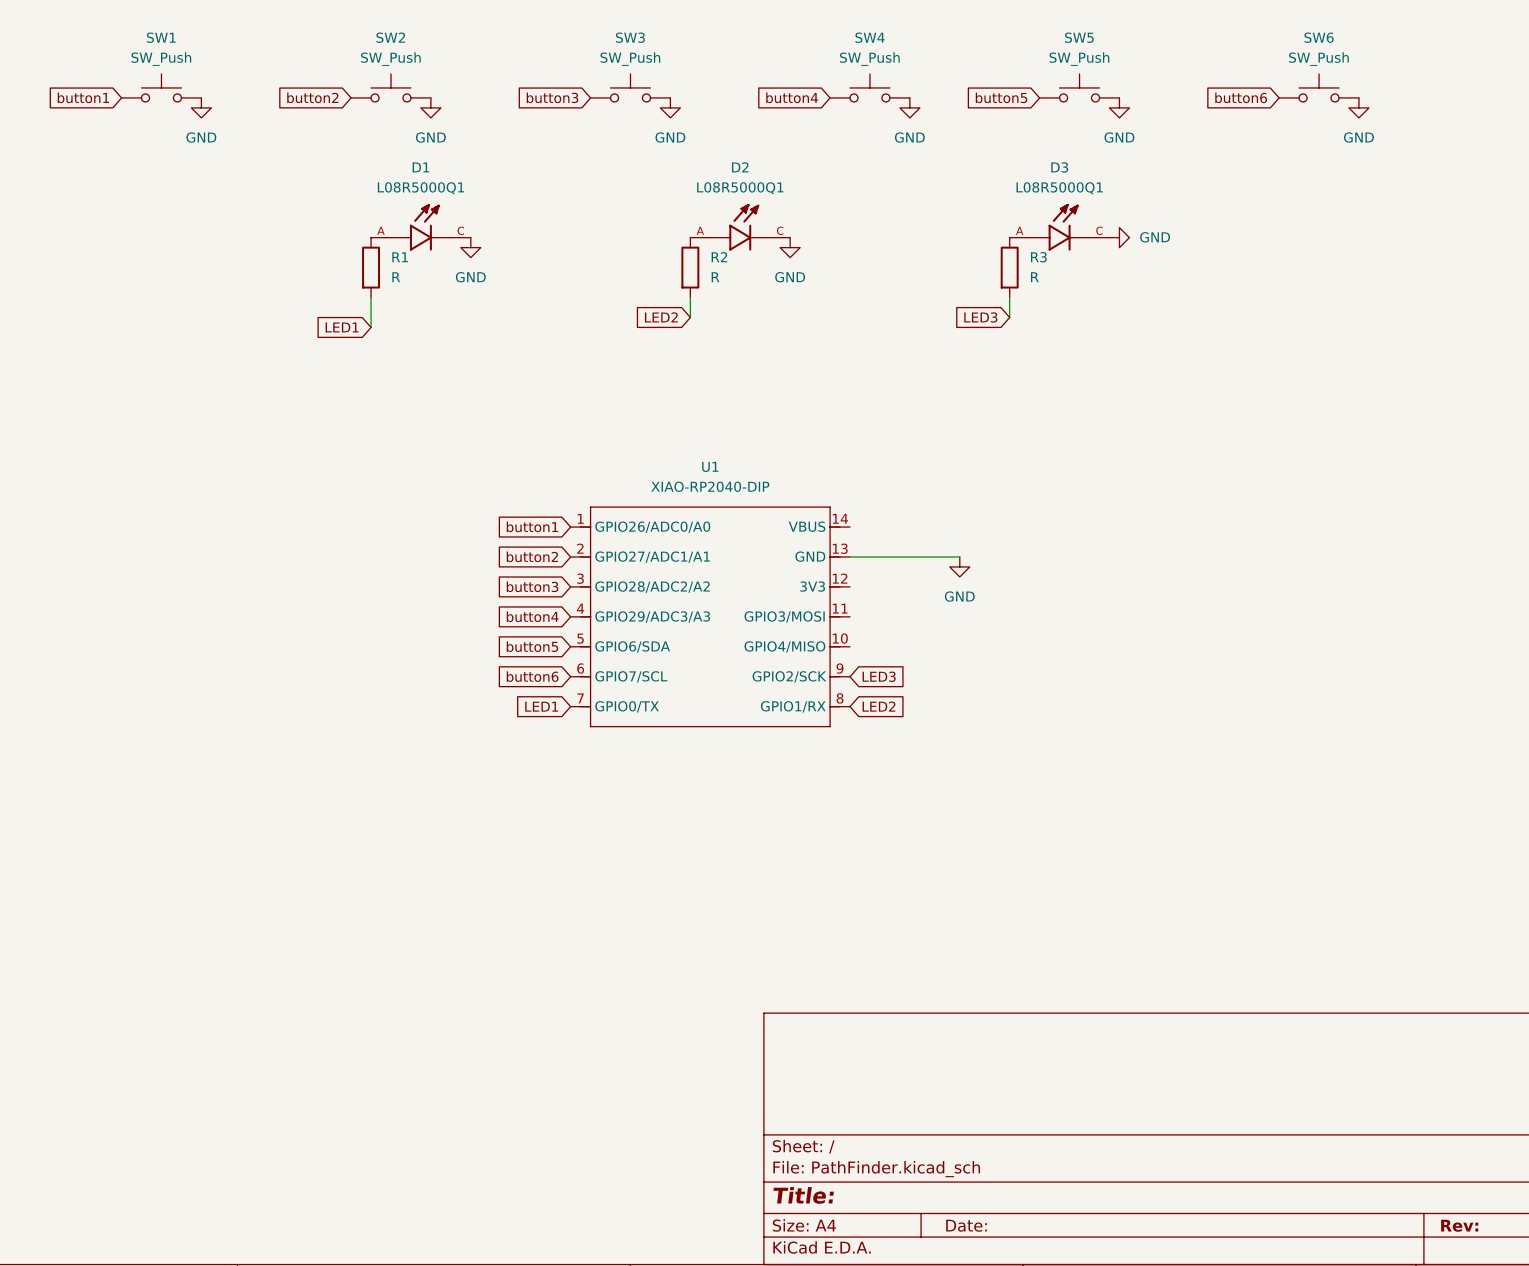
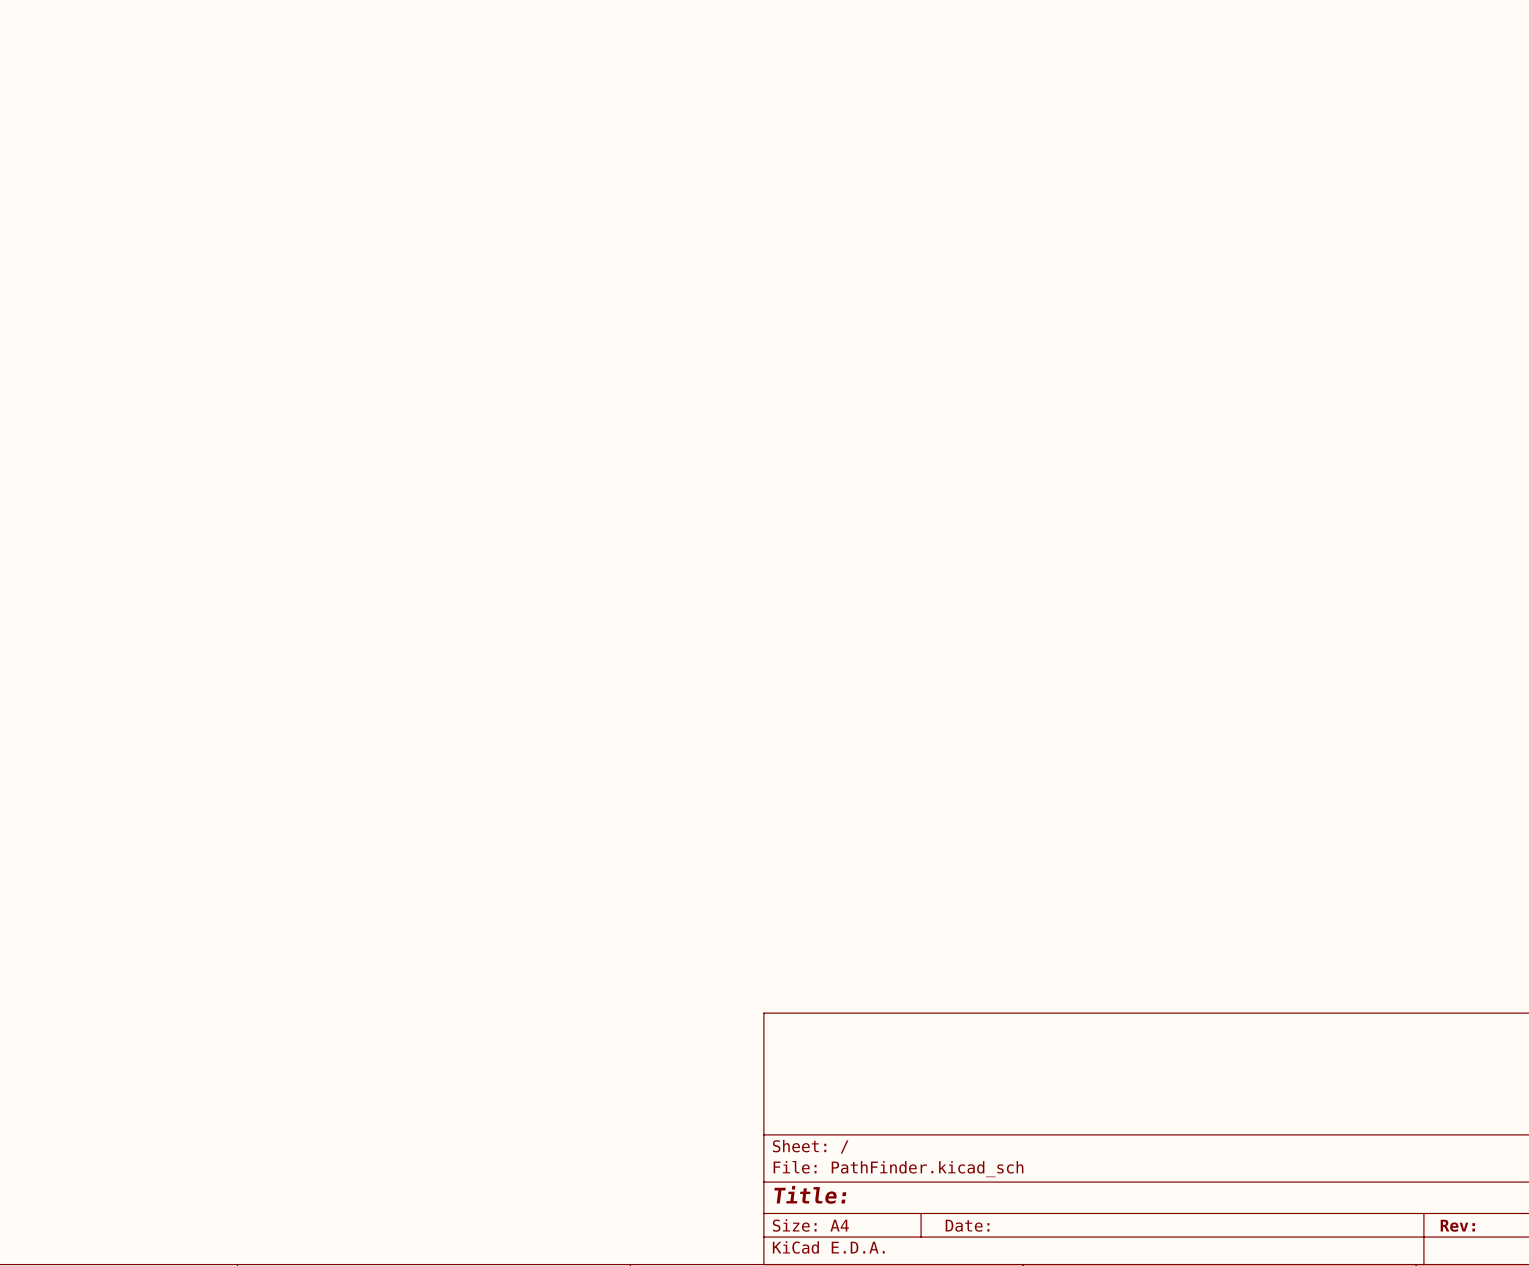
SW1: SW_Push (161, 87) -> none
SW2: SW_Push (390, 87) -> none
SW3: SW_Push (630, 87) -> none
SW4: SW_Push (869, 87) -> none
SW5: SW_Push (1079, 87) -> none
SW6: SW_Push (1319, 87) -> none
global label: button1 (83, 97) -> none
global label: button2 (312, 97) -> none
global label: button3 (552, 97) -> none
global label: button4 (792, 97) -> none
global label: button5 (1001, 97) -> none
global label: button6 (1241, 97) -> none
power symbol: GND (201, 107) -> none
power symbol: GND (430, 107) -> none
power symbol: GND (670, 107) -> none
power symbol: GND (909, 107) -> none
power symbol: GND (1119, 107) -> none
power symbol: GND (1358, 107) -> none
D1: L08R5000Q1 (420, 227) -> none
D2: L08R5000Q1 (740, 227) -> none
D3: L08R5000Q1 (1059, 227) -> none
power symbol: GND (1119, 237) -> none
power symbol: GND (470, 247) -> none
power symbol: GND (790, 247) -> none
R1: R (371, 267) -> none
R2: R (690, 267) -> none
R3: R (1009, 267) -> none
wire: (371, 297) (371, 327) -> none
wire: (690, 297) (690, 317) -> none
wire: (1009, 297) (1009, 317) -> none
global label: LED2 (661, 317) -> none
global label: LED3 (980, 317) -> none
global label: LED1 (342, 327) -> none
global label: button1 (532, 526) -> none
global label: button2 (532, 556) -> none
wire: (850, 556) (959, 556) -> none
power symbol: GND (959, 566) -> none
global label: button3 (532, 586) -> none
global label: button4 (532, 616) -> none
U1: XIAO-RP2040-DIP (710, 616) -> none
global label: button5 (532, 646) -> none
global label: button6 (532, 676) -> none
global label: LED3 (879, 676) -> none
global label: LED1 (541, 706) -> none
global label: LED2 (878, 706) -> none

